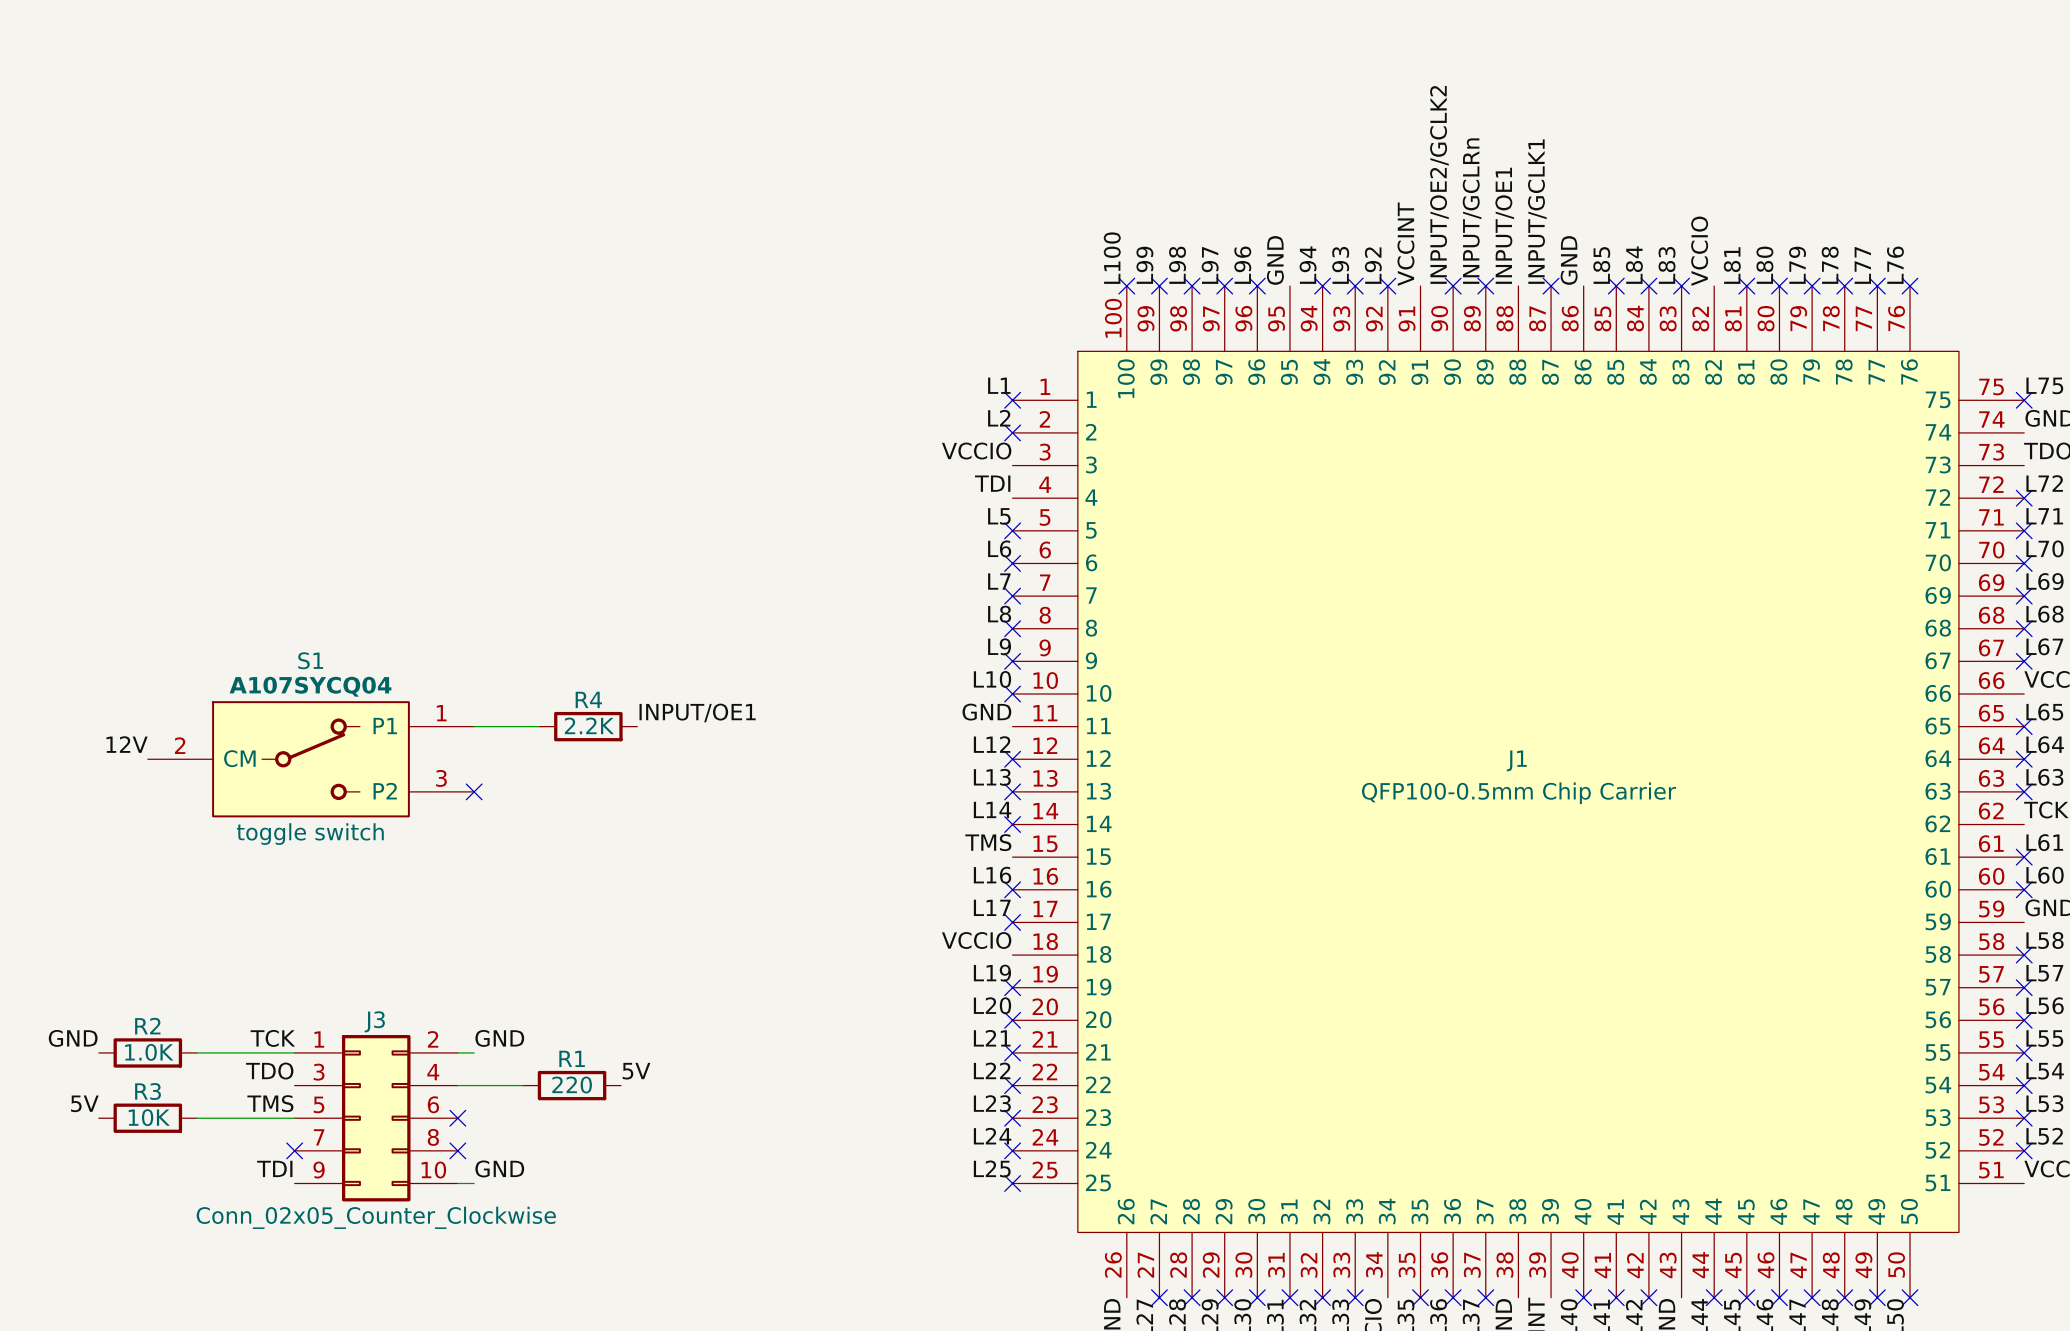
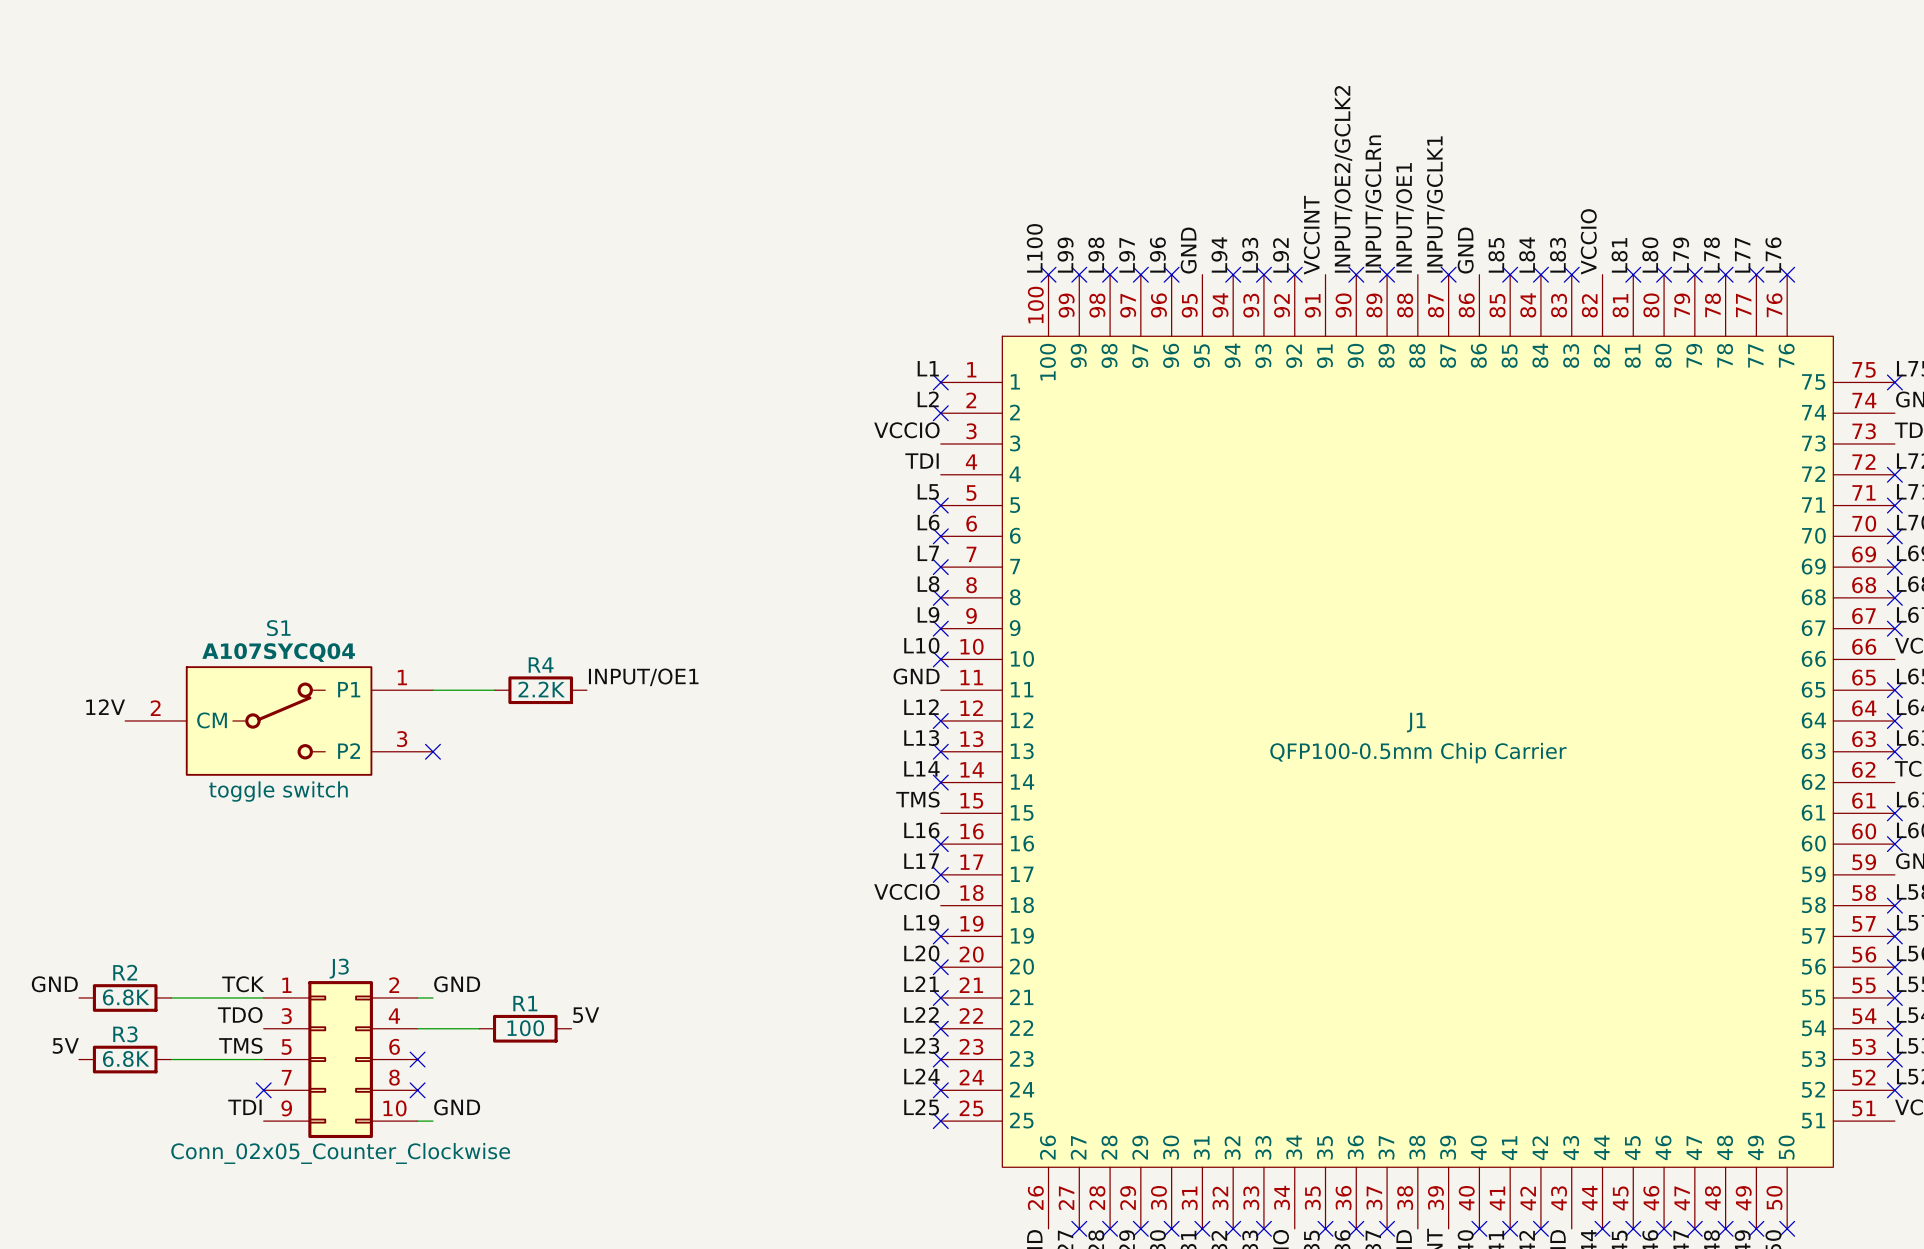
R2 value: 1.0K (149, 1052) -> 6.8K (126, 997)
R1 value: 220 (572, 1084) -> 100 (525, 1028)
R3 value: 10K (149, 1117) -> 6.8K (126, 1058)

